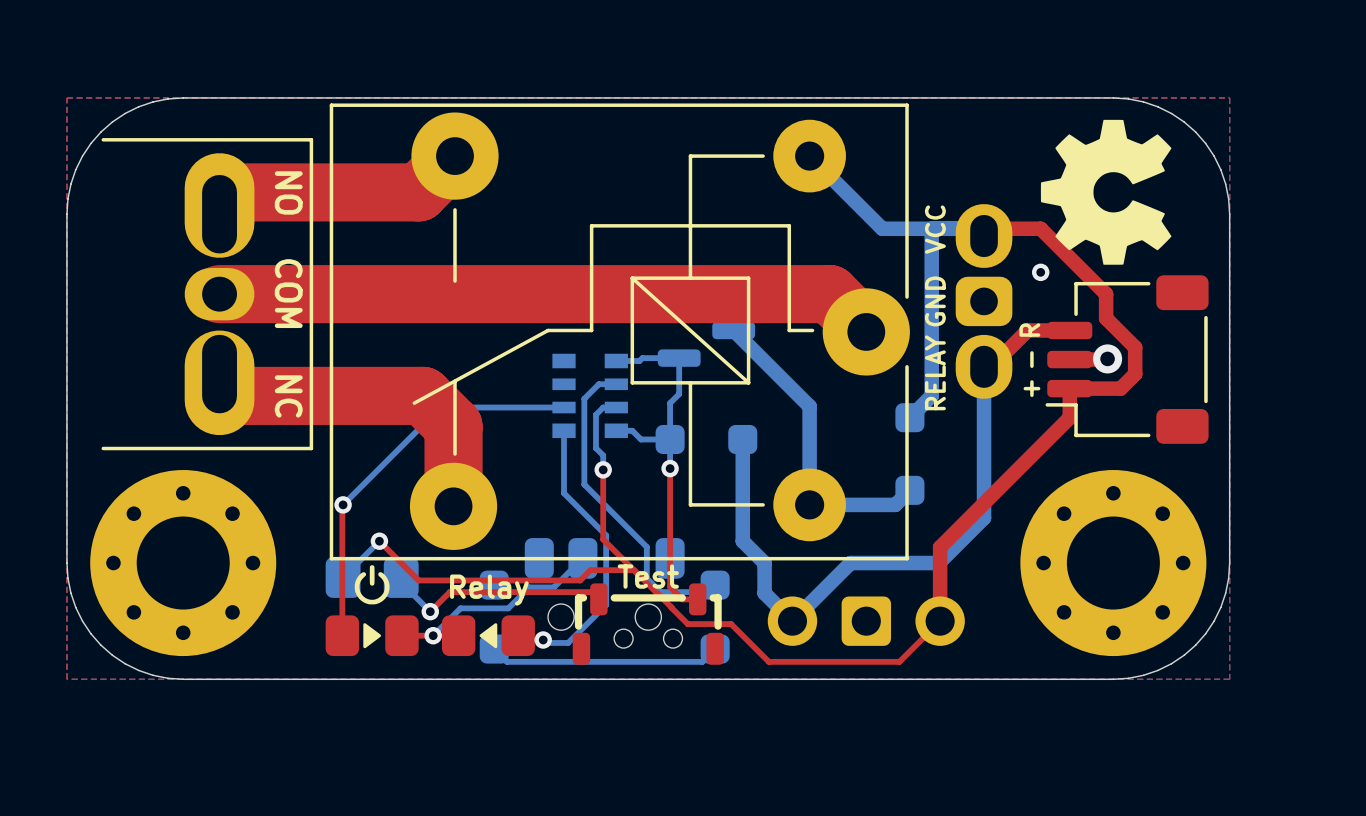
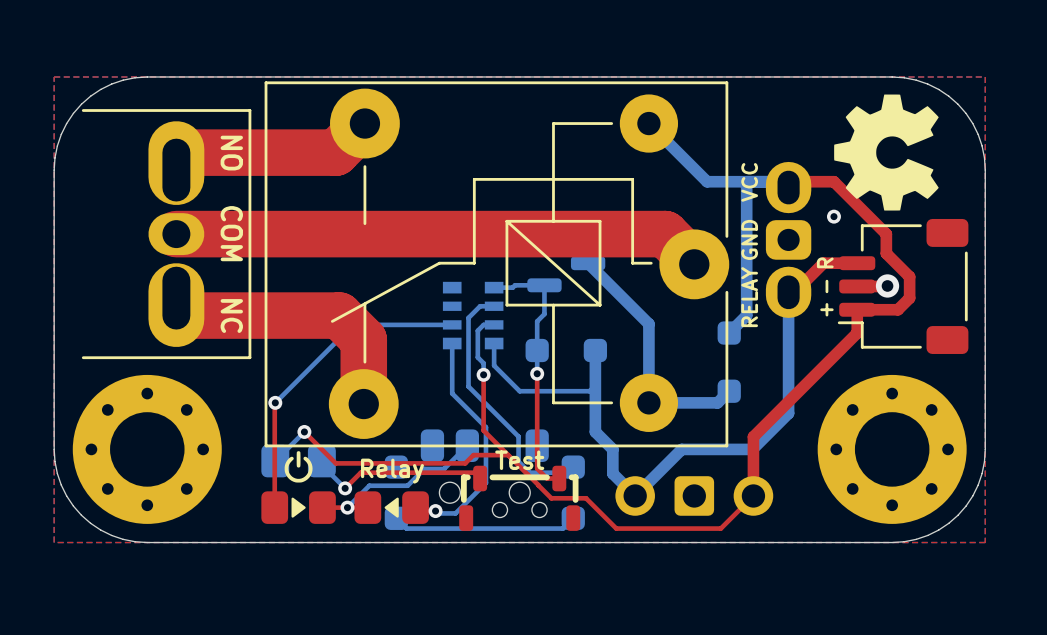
bottom track: (616, 430) (632, 430) (641, 439) (670, 439) -> (494, 343) (494, 365) (519, 391) (589, 391) (595, 385) (595, 350)

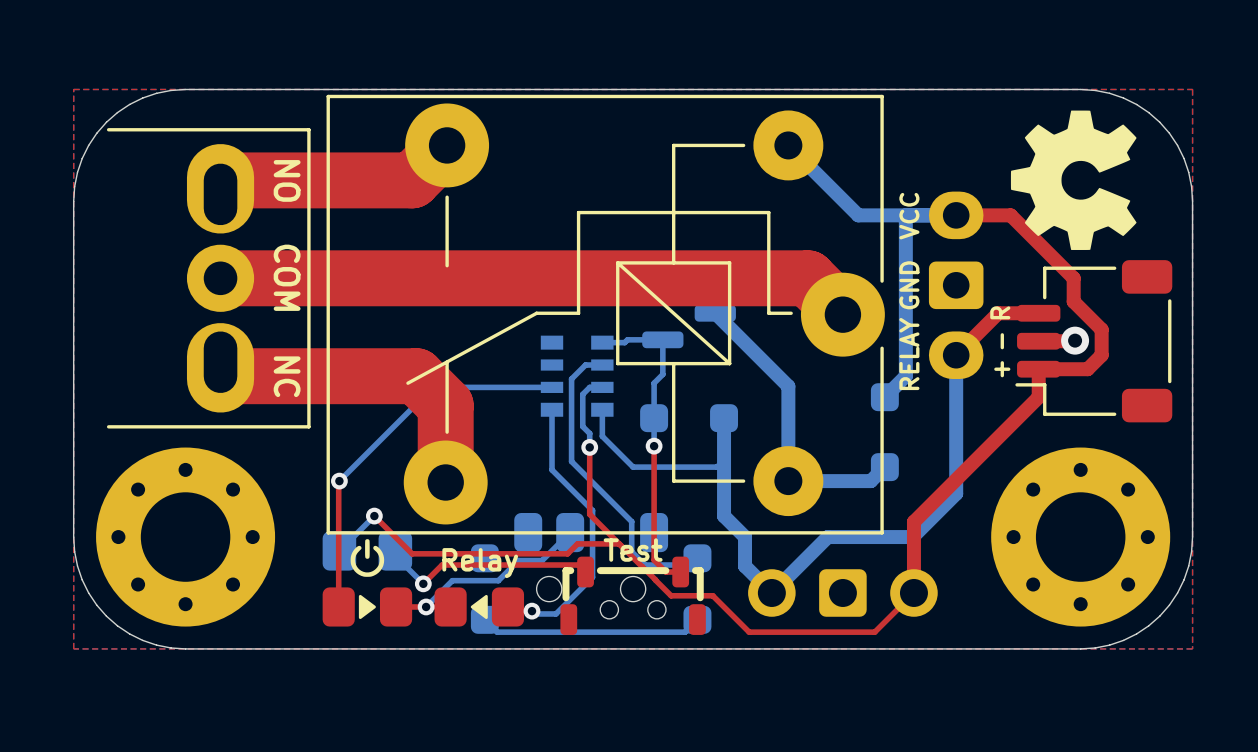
part footprint: [81, 109, 252, 360] -> [106, 128, 311, 429]
part footprint: [765, 161, 812, 318] -> [928, 191, 984, 380]
via: (833, 216) -> none

